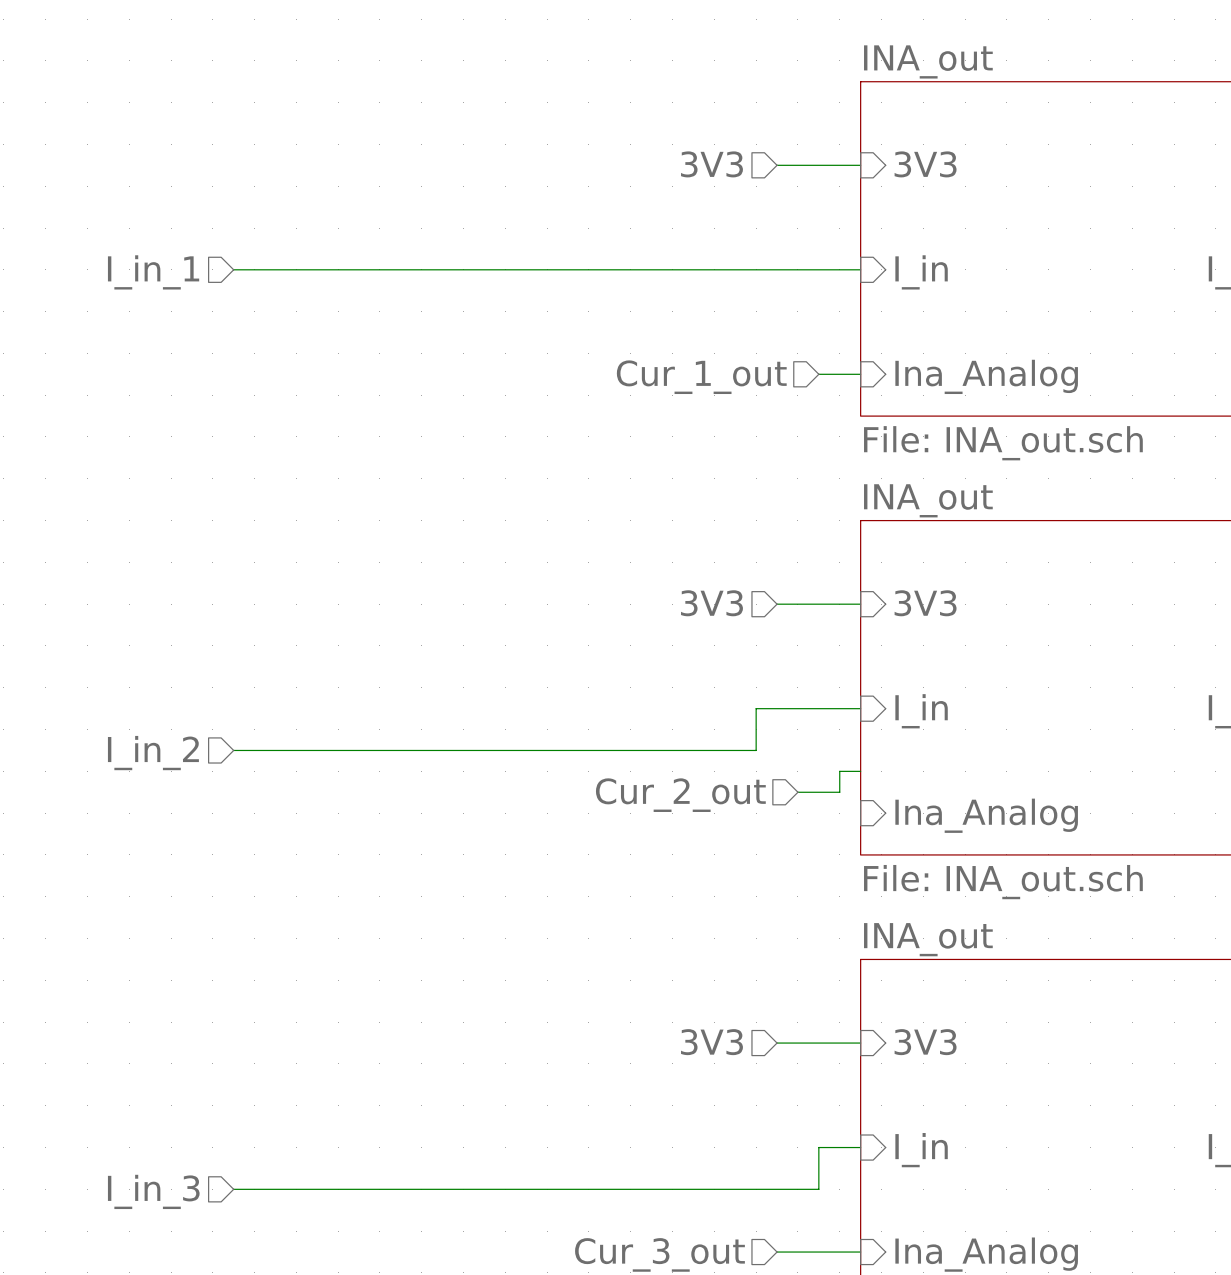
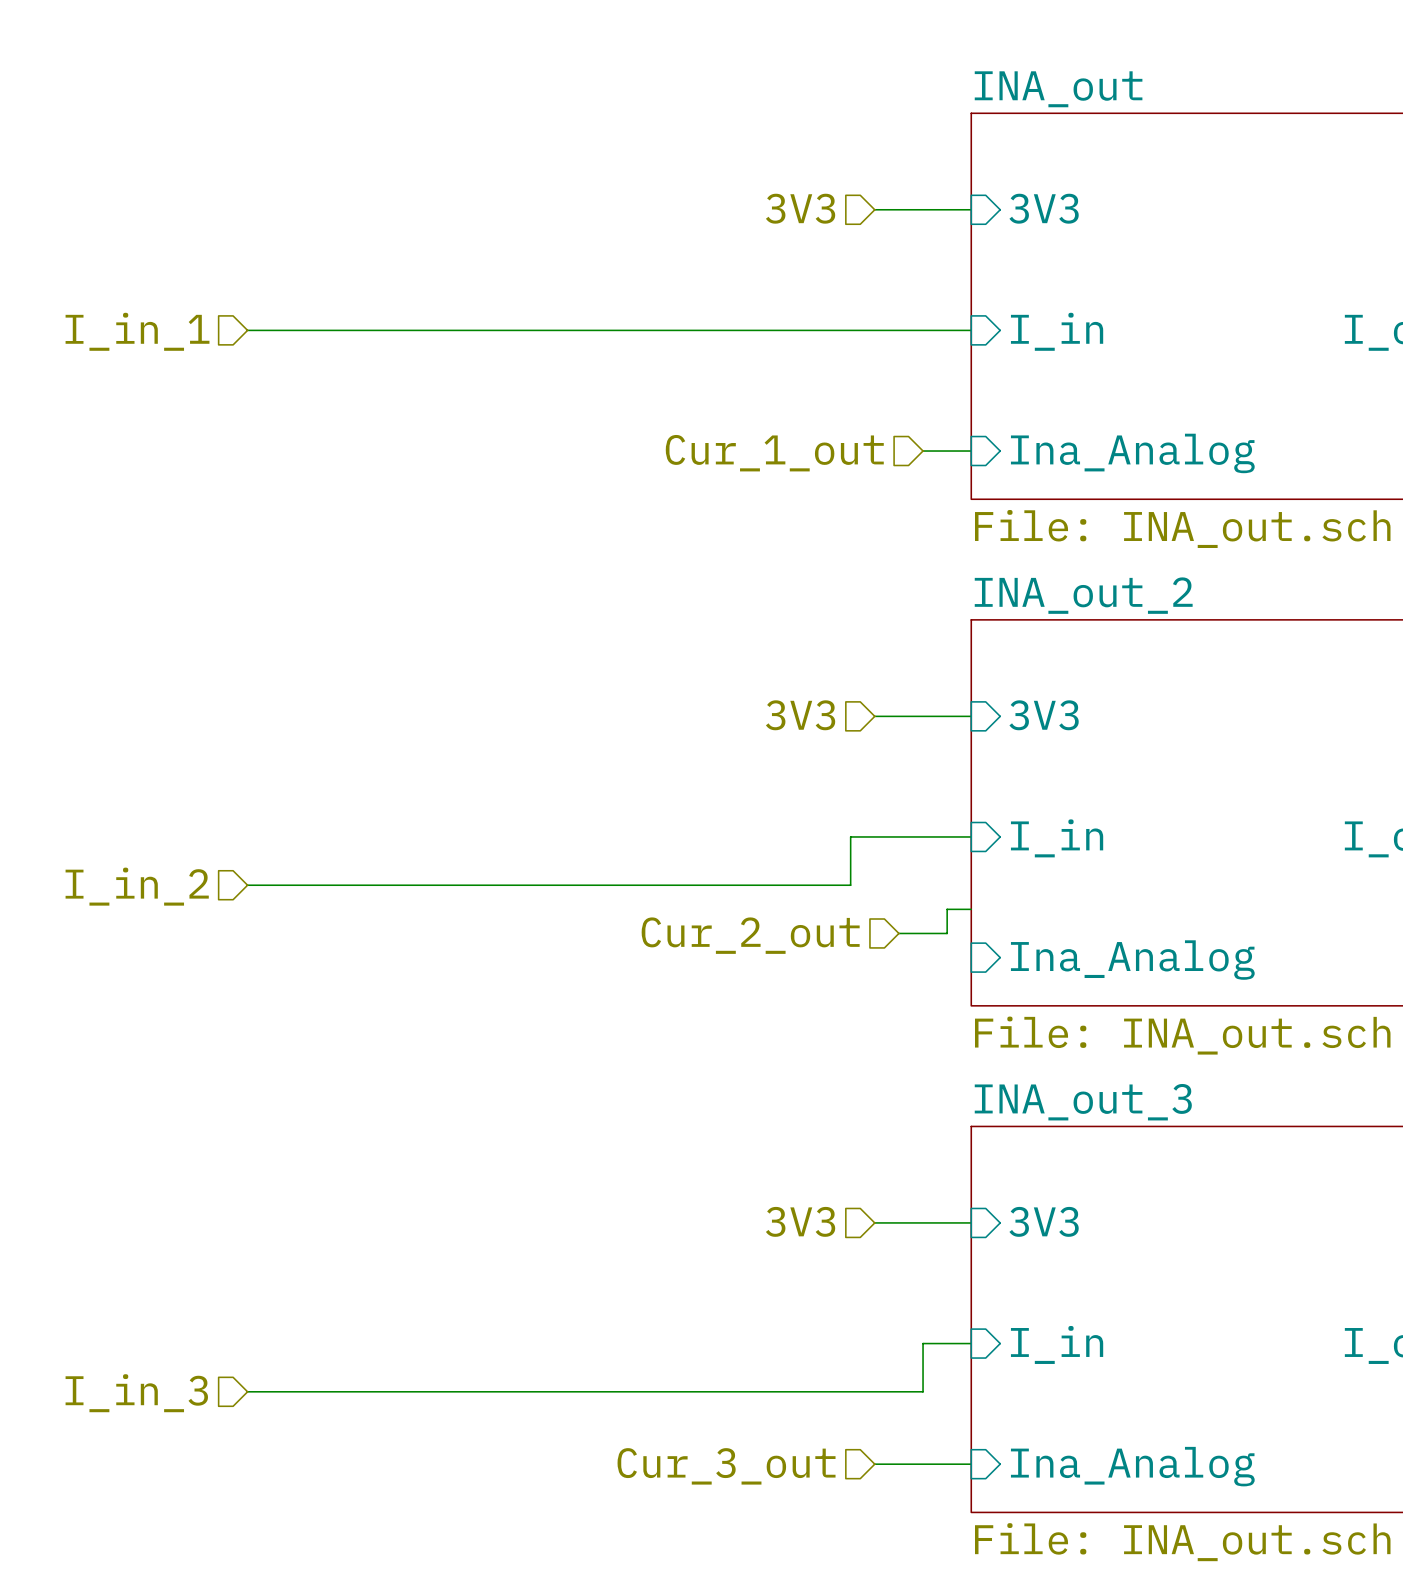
sheet INA_out name: INA_out (928, 500) -> INA_out_2 (1083, 595)
sheet INA_out name: INA_out (928, 939) -> INA_out_3 (1083, 1102)

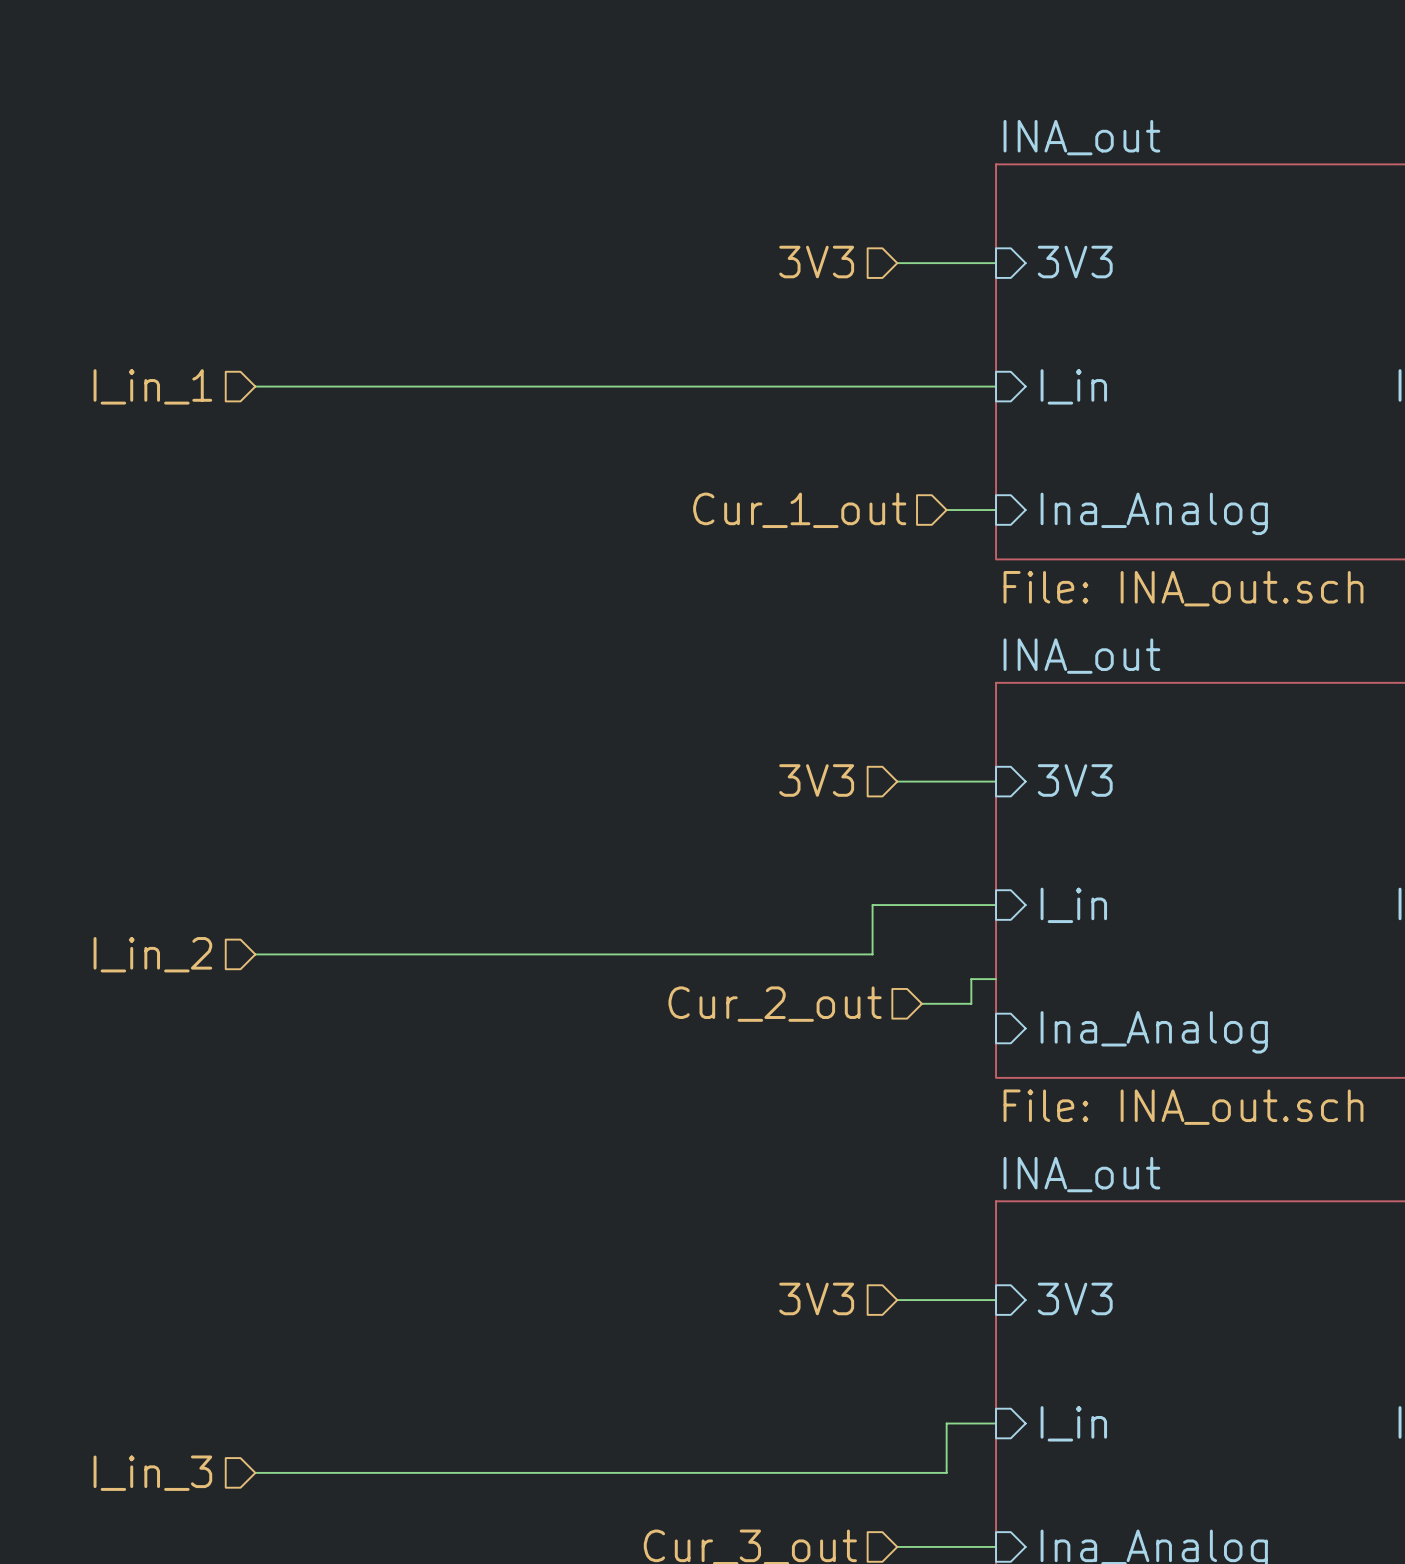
sheet INA_out_2 name: INA_out_2 (1083, 595) -> INA_out (1081, 656)
sheet INA_out_3 name: INA_out_3 (1083, 1102) -> INA_out (1081, 1174)

